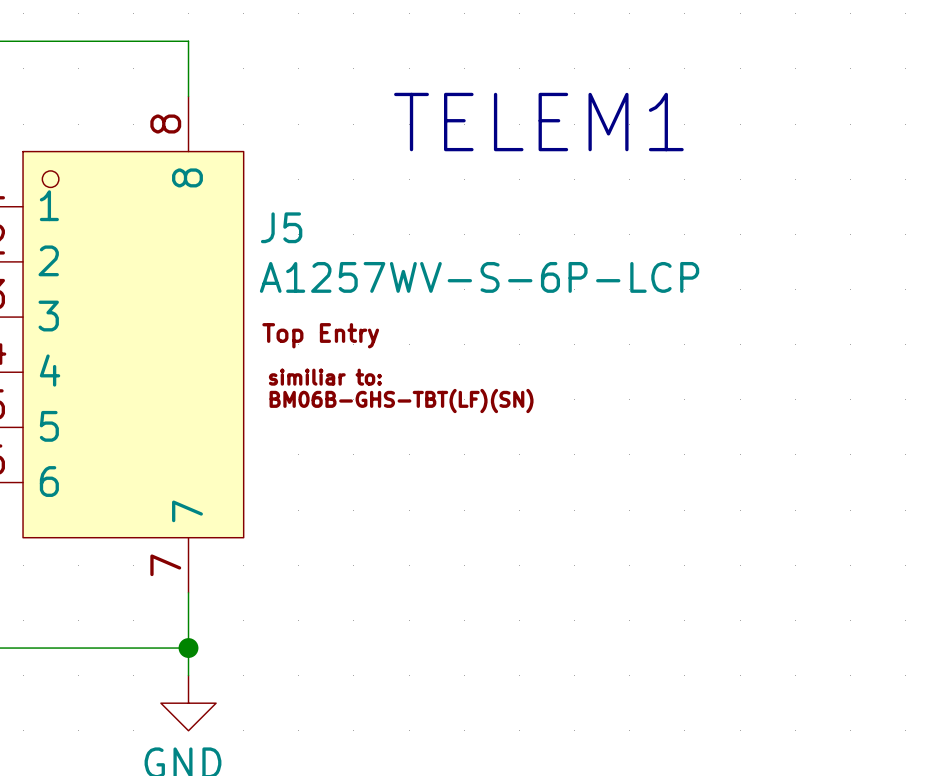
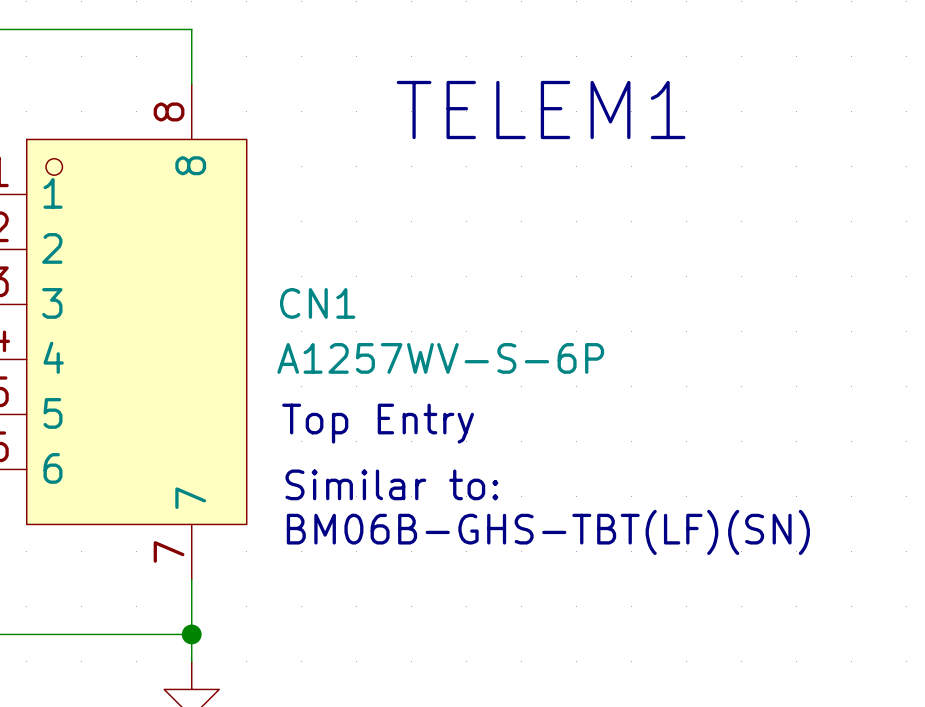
J5 name: J5 (281, 227) -> CN1 (317, 303)
J5 value: A1257WV-S-6P-LCP (479, 277) -> A1257WV-S-6P (440, 358)
J5 text: Top Entry (320, 335) -> none
J5 text: similiar to: (325, 377) -> none
J5 text: BM06B-GHS-TBT(LF)(SN) (401, 401) -> none
text: none -> Top Entry (378, 423)
text: none -> Similar to: (391, 484)
text: none -> BM06B-GHS-TBT(LF)(SN) (548, 532)

